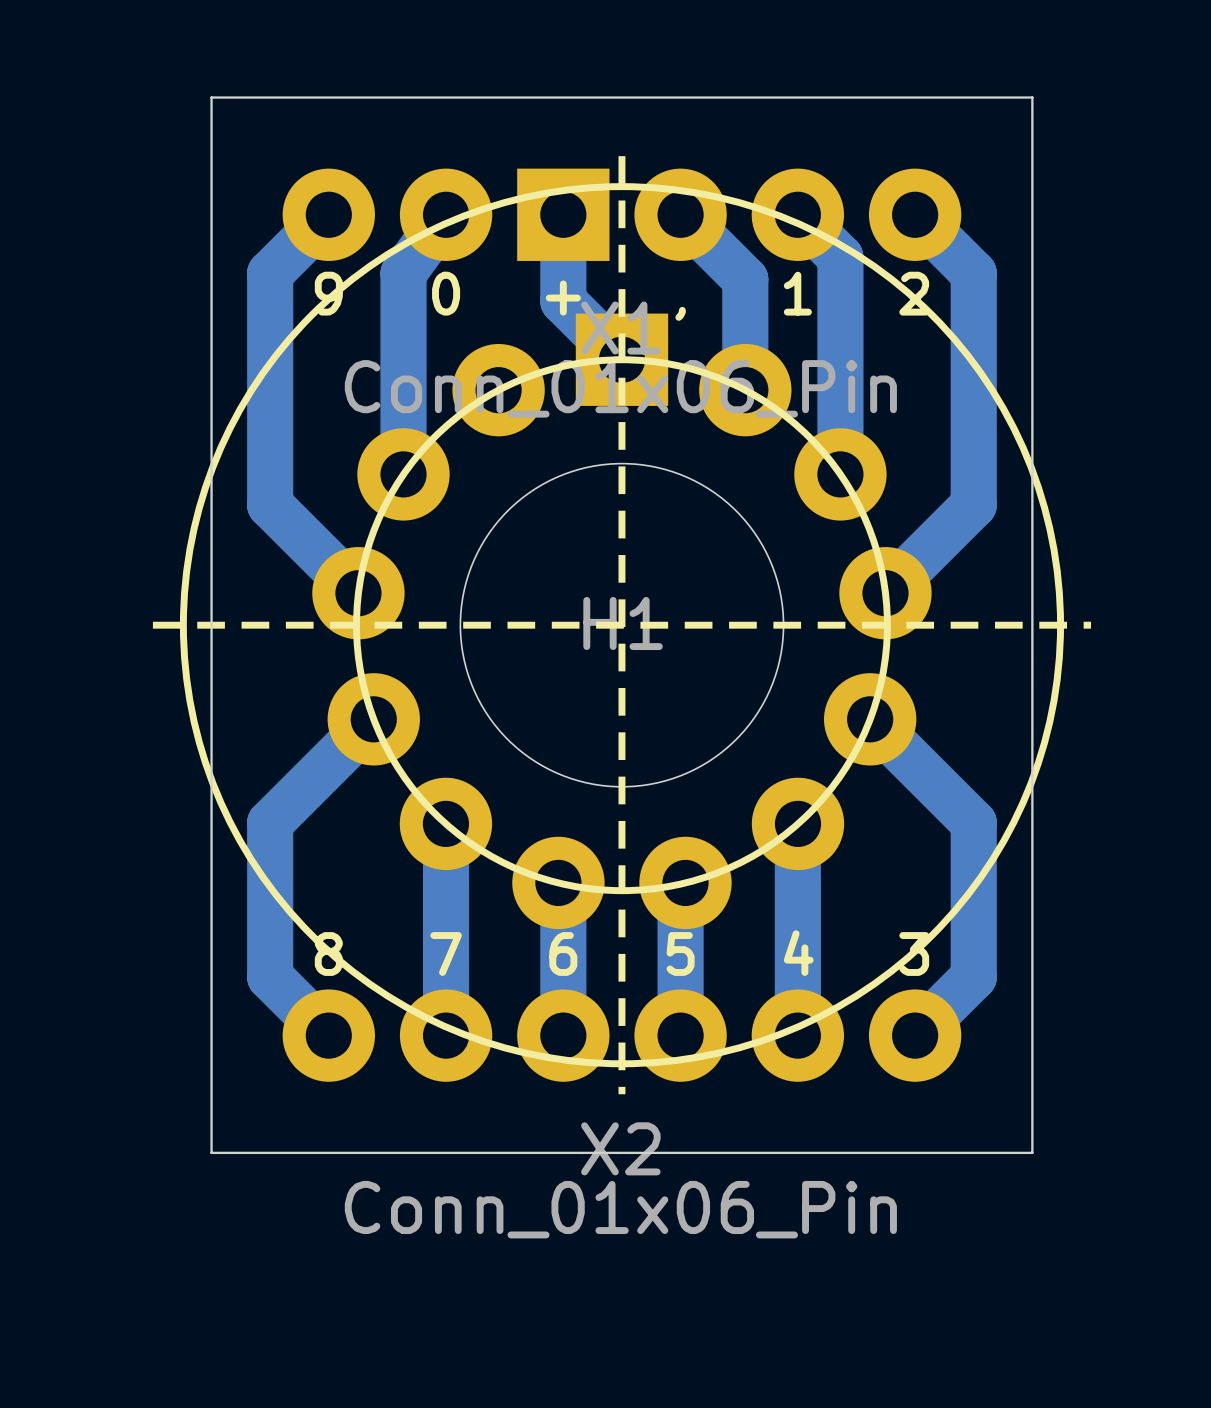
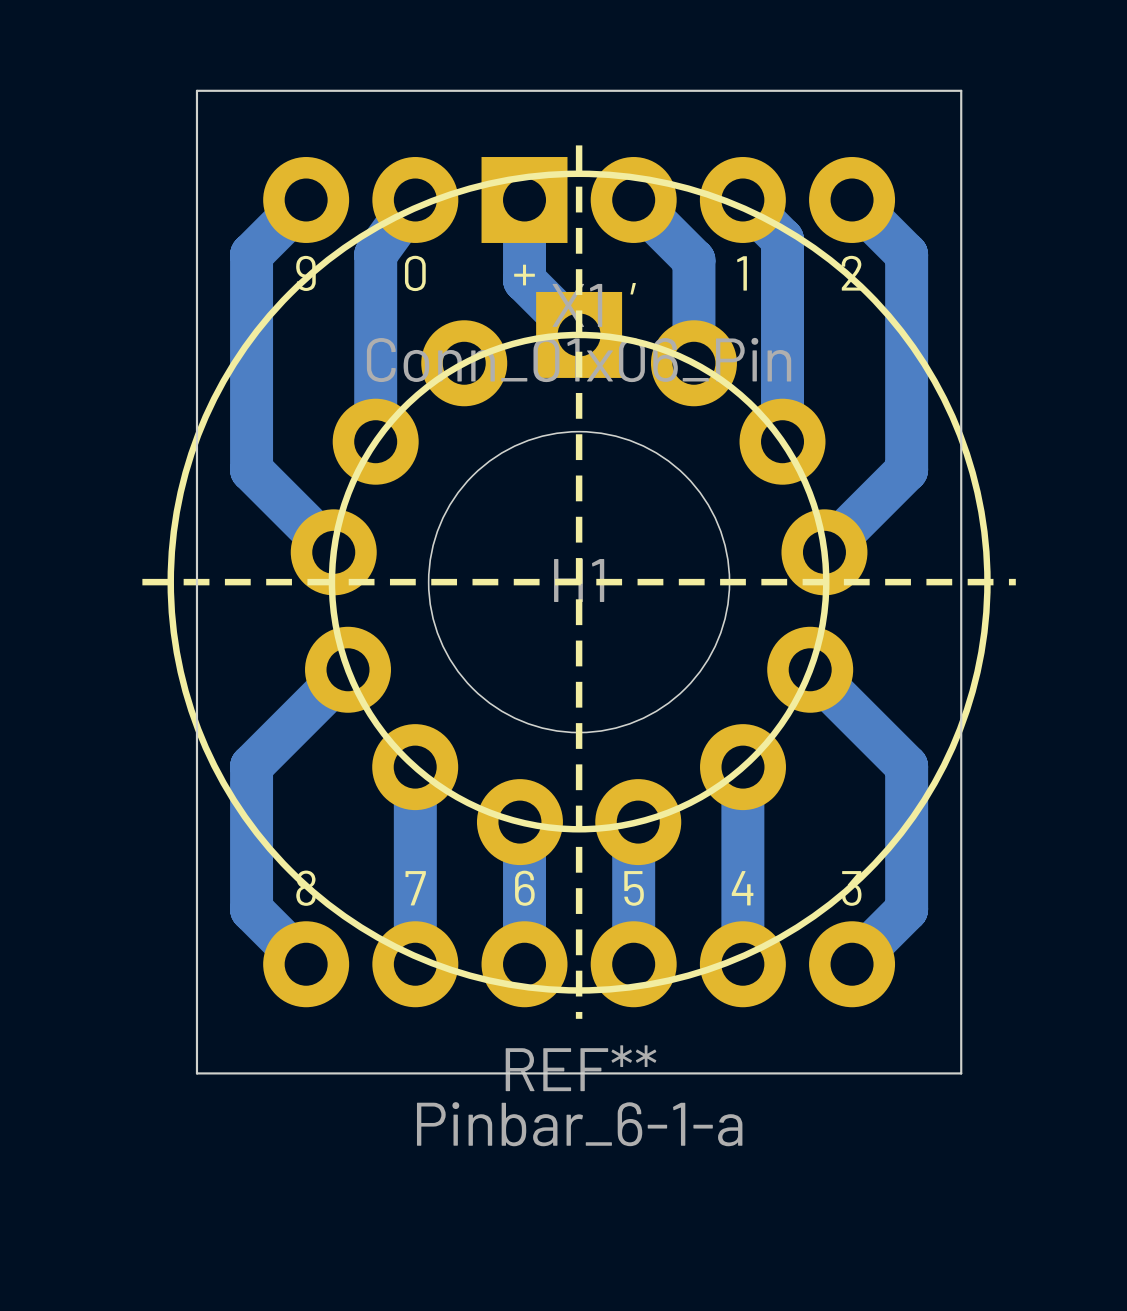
X2 name: X2 (620, 1148) -> REF** (581, 1068)
X2 value: Conn_01x06_Pin (620, 1209) -> Pinbar_6-1-a (579, 1124)

